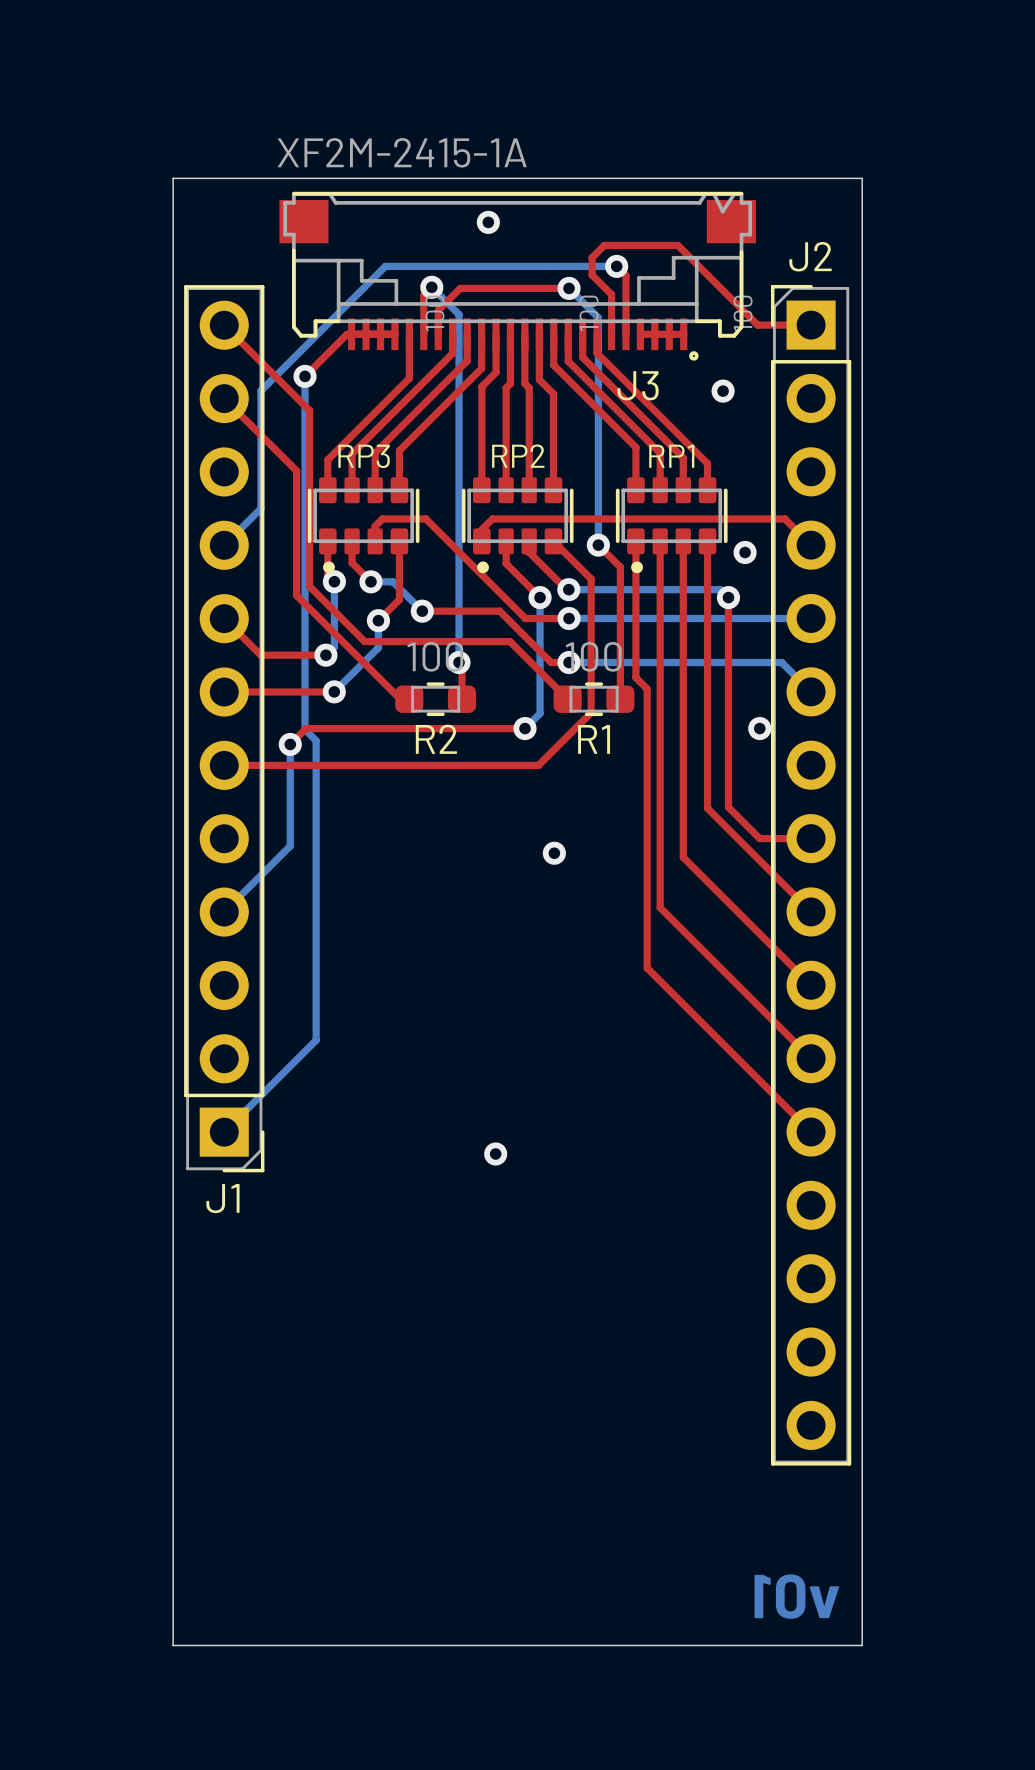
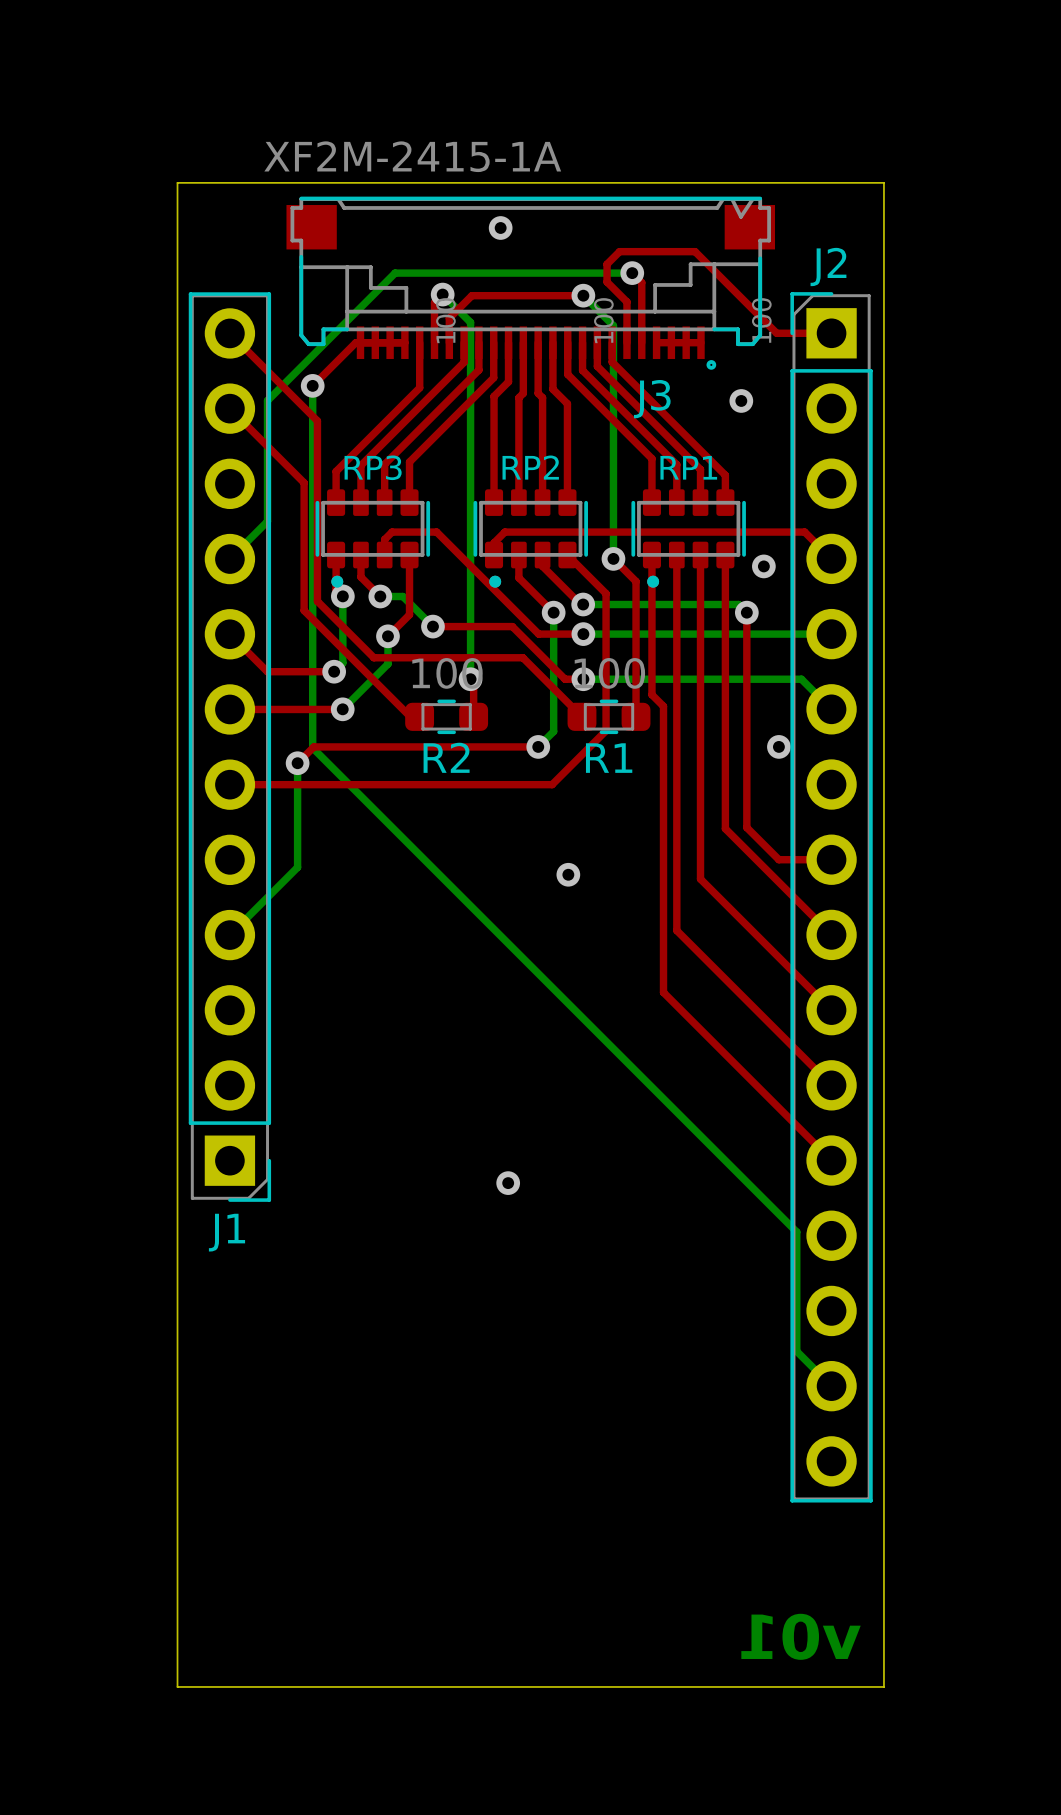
bottom track: (316, 740) (316, 1040) (224, 1132) -> (324, 759) (796, 1232) (796, 1351) (831, 1386)

